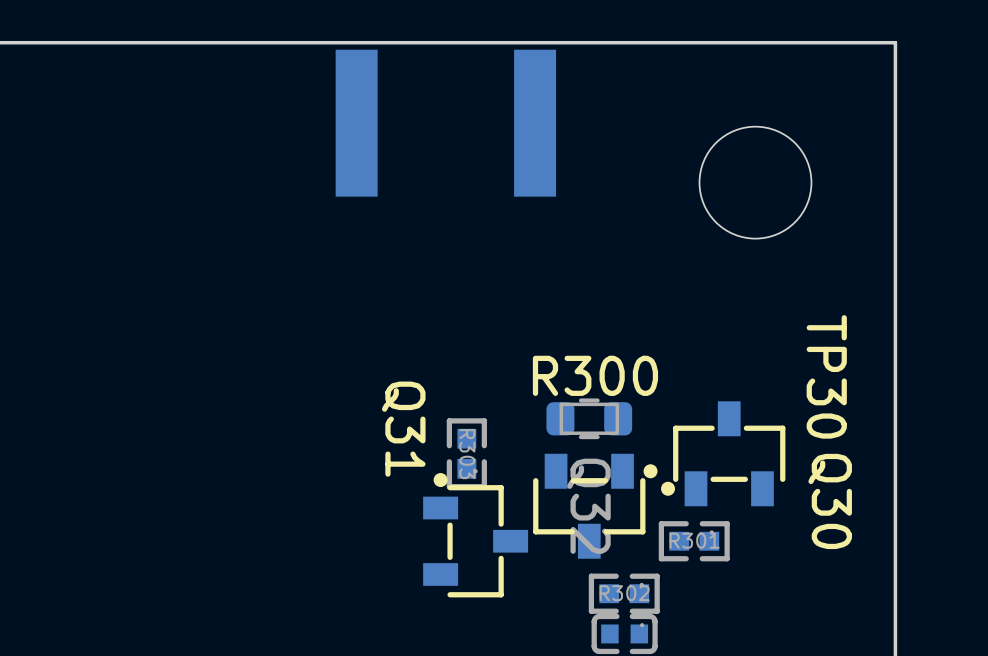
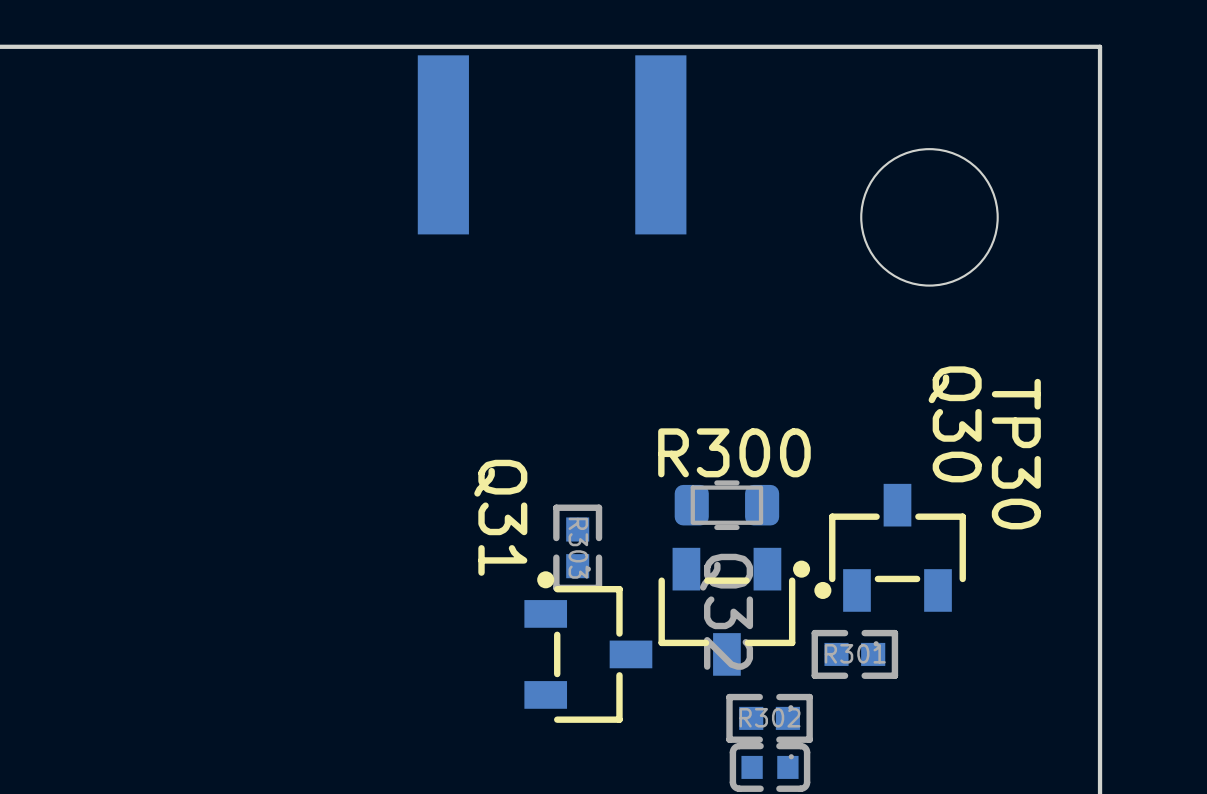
Q30 name position: Q30 (830, 501) -> Q30 (955, 424)

